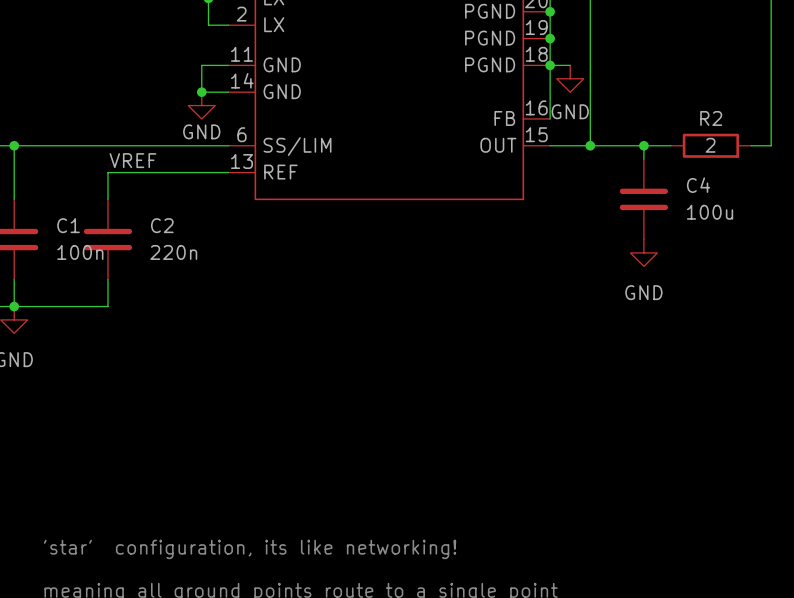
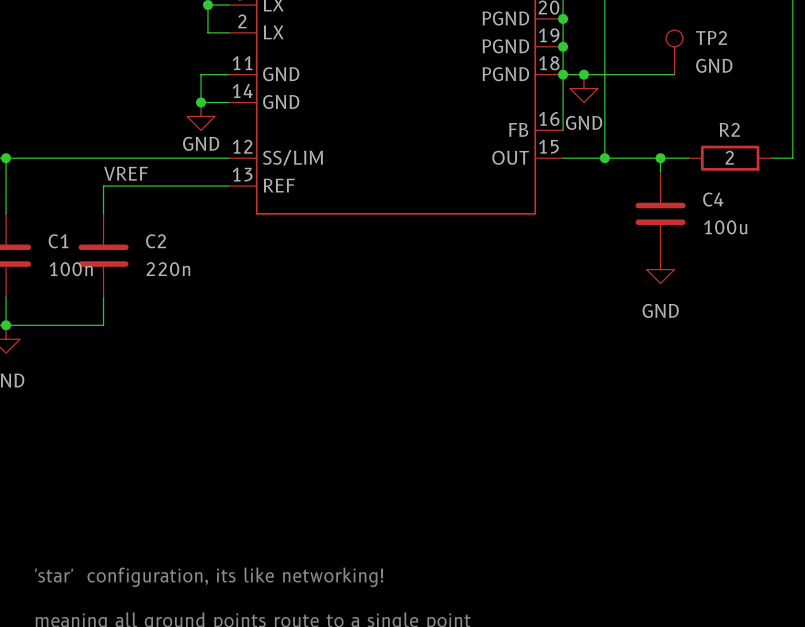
TP2: none -> GND (674, 52)
wire: none -> (583, 74) (674, 74)
junction: none -> (583, 74)
part pin number: 6 (241, 134) -> 12 (242, 146)

